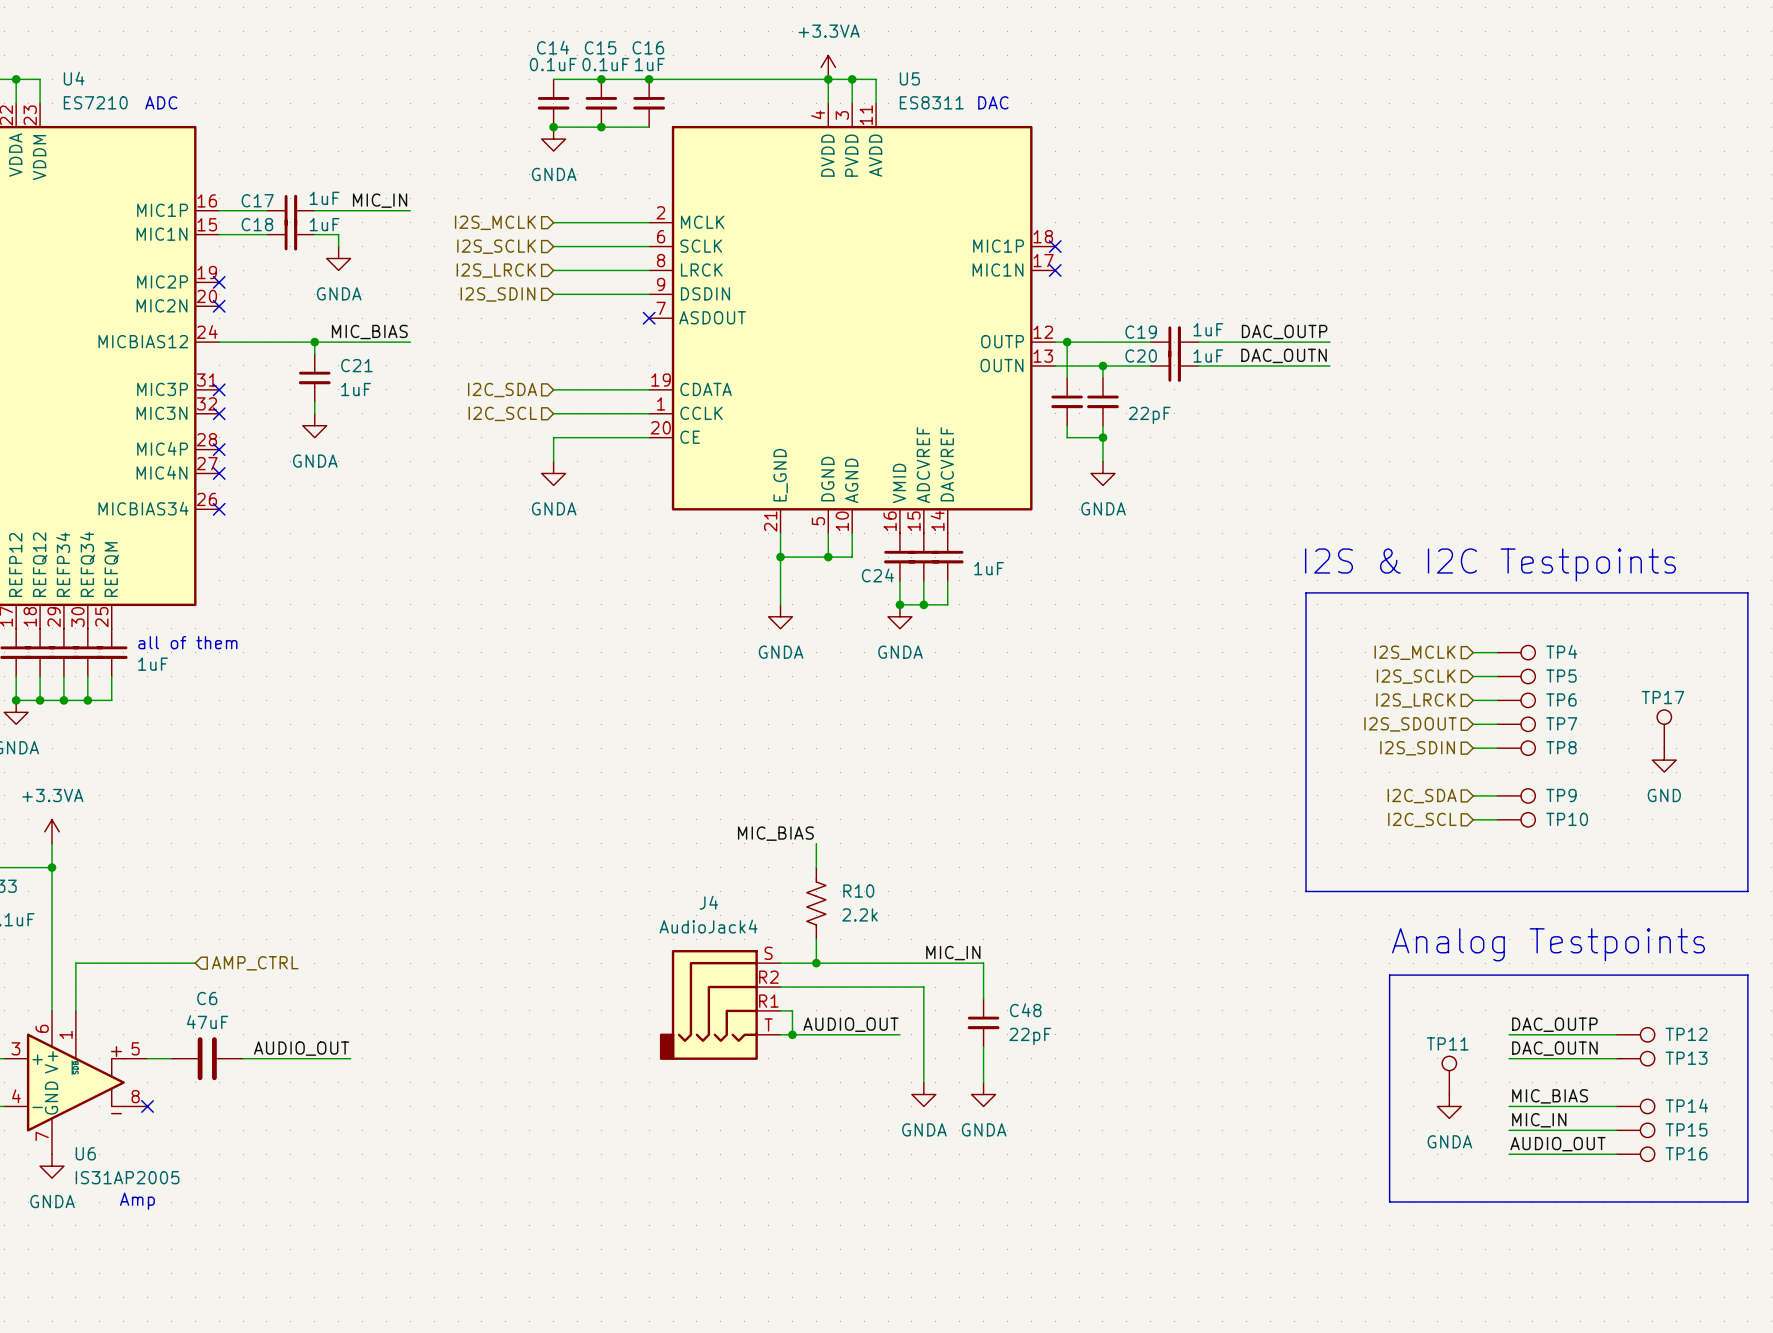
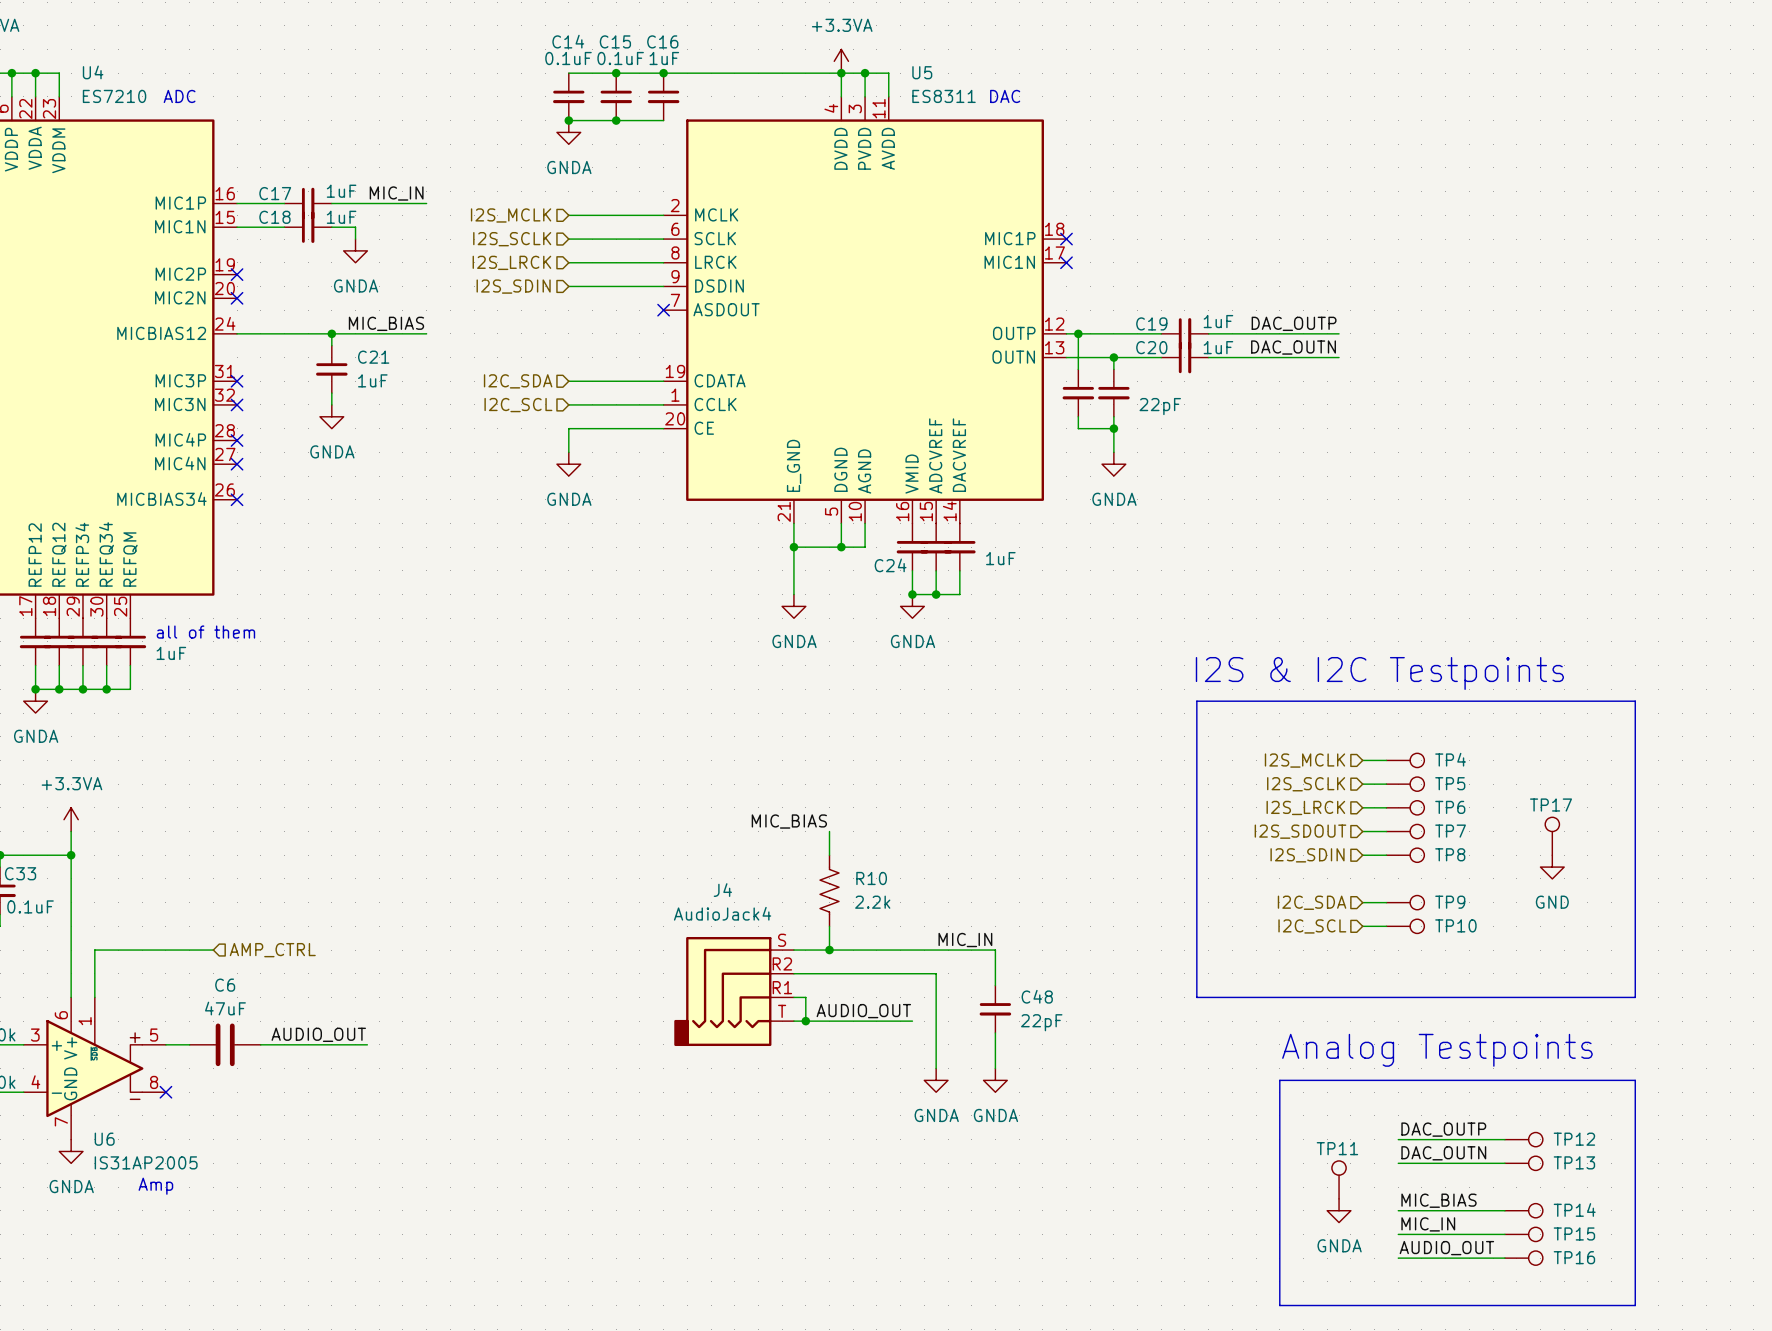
text position: I2S & I2C Testpoints (1490, 564) -> I2S & I2C Testpoints (1379, 673)
line: (1306, 592) (1747, 592) (1747, 891) (1306, 891) (1306, 592) -> (1196, 701) (1635, 701) (1635, 997) (1196, 997) (1196, 701)
hierarchical label position: I2S_MCLK (1415, 652) -> I2S_MCLK (1304, 760)
wire: (1473, 652) (1497, 652) -> (1362, 760) (1386, 760)
TP4 position: (1516, 652) -> (1405, 760)
hierarchical label position: I2S_SCLK (1416, 676) -> I2S_SCLK (1306, 784)
wire: (1473, 676) (1497, 676) -> (1362, 784) (1386, 784)
TP5 position: (1516, 676) -> (1405, 784)
hierarchical label position: I2S_LRCK (1415, 700) -> I2S_LRCK (1305, 807)
wire: (1473, 700) (1497, 700) -> (1362, 807) (1386, 807)
TP6 position: (1516, 700) -> (1405, 807)
hierarchical label position: I2S_SDOUT (1410, 724) -> I2S_SDOUT (1300, 831)
wire: (1473, 724) (1497, 724) -> (1362, 831) (1386, 831)
TP7 position: (1516, 724) -> (1405, 831)
TP17 position: (1664, 729) -> (1552, 836)
hierarchical label position: I2S_SDIN (1417, 748) -> I2S_SDIN (1307, 855)
wire: (1473, 748) (1497, 748) -> (1362, 855) (1386, 855)
TP8 position: (1516, 748) -> (1405, 855)
power symbol position: GND (1664, 760) -> GND (1552, 867)
wire: (1473, 795) (1497, 795) -> (1362, 902) (1386, 902)
TP9 position: (1516, 795) -> (1405, 902)
hierarchical label position: I2C_SDA (1422, 796) -> I2C_SDA (1312, 902)
hierarchical label position: I2C_SCL (1422, 819) -> I2C_SCL (1312, 926)
wire: (1473, 819) (1497, 819) -> (1362, 926) (1386, 926)
TP10 position: (1516, 819) -> (1405, 926)
text position: Analog Testpoints (1548, 944) -> Analog Testpoints (1437, 1050)
line: (1389, 975) (1747, 975) (1747, 1202) (1389, 1202) (1389, 975) -> (1279, 1080) (1635, 1080) (1635, 1305) (1279, 1305) (1279, 1080)
label position: DAC_OUTP (1554, 1024) -> DAC_OUTP (1443, 1129)
wire: (1509, 1034) (1616, 1034) -> (1398, 1139) (1504, 1139)
TP12 position: (1635, 1034) -> (1523, 1139)
label position: DAC_OUTN (1554, 1048) -> DAC_OUTN (1443, 1153)
wire: (1509, 1058) (1616, 1058) -> (1398, 1163) (1504, 1163)
TP13 position: (1635, 1058) -> (1523, 1163)
TP11 position: (1449, 1075) -> (1339, 1179)
label position: MIC_BIAS (1550, 1096) -> MIC_BIAS (1438, 1200)
power symbol position: GNDA (1449, 1106) -> GNDA (1339, 1210)
wire: (1509, 1106) (1616, 1106) -> (1398, 1210) (1504, 1210)
TP14 position: (1635, 1106) -> (1523, 1210)
label position: MIC_IN (1539, 1120) -> MIC_IN (1428, 1224)
wire: (1509, 1130) (1616, 1130) -> (1398, 1234) (1504, 1234)
TP15 position: (1635, 1130) -> (1523, 1234)
label position: AUDIO_OUT (1558, 1144) -> AUDIO_OUT (1446, 1248)
wire: (1509, 1154) (1616, 1154) -> (1398, 1258) (1504, 1258)
TP16 position: (1635, 1154) -> (1523, 1258)

